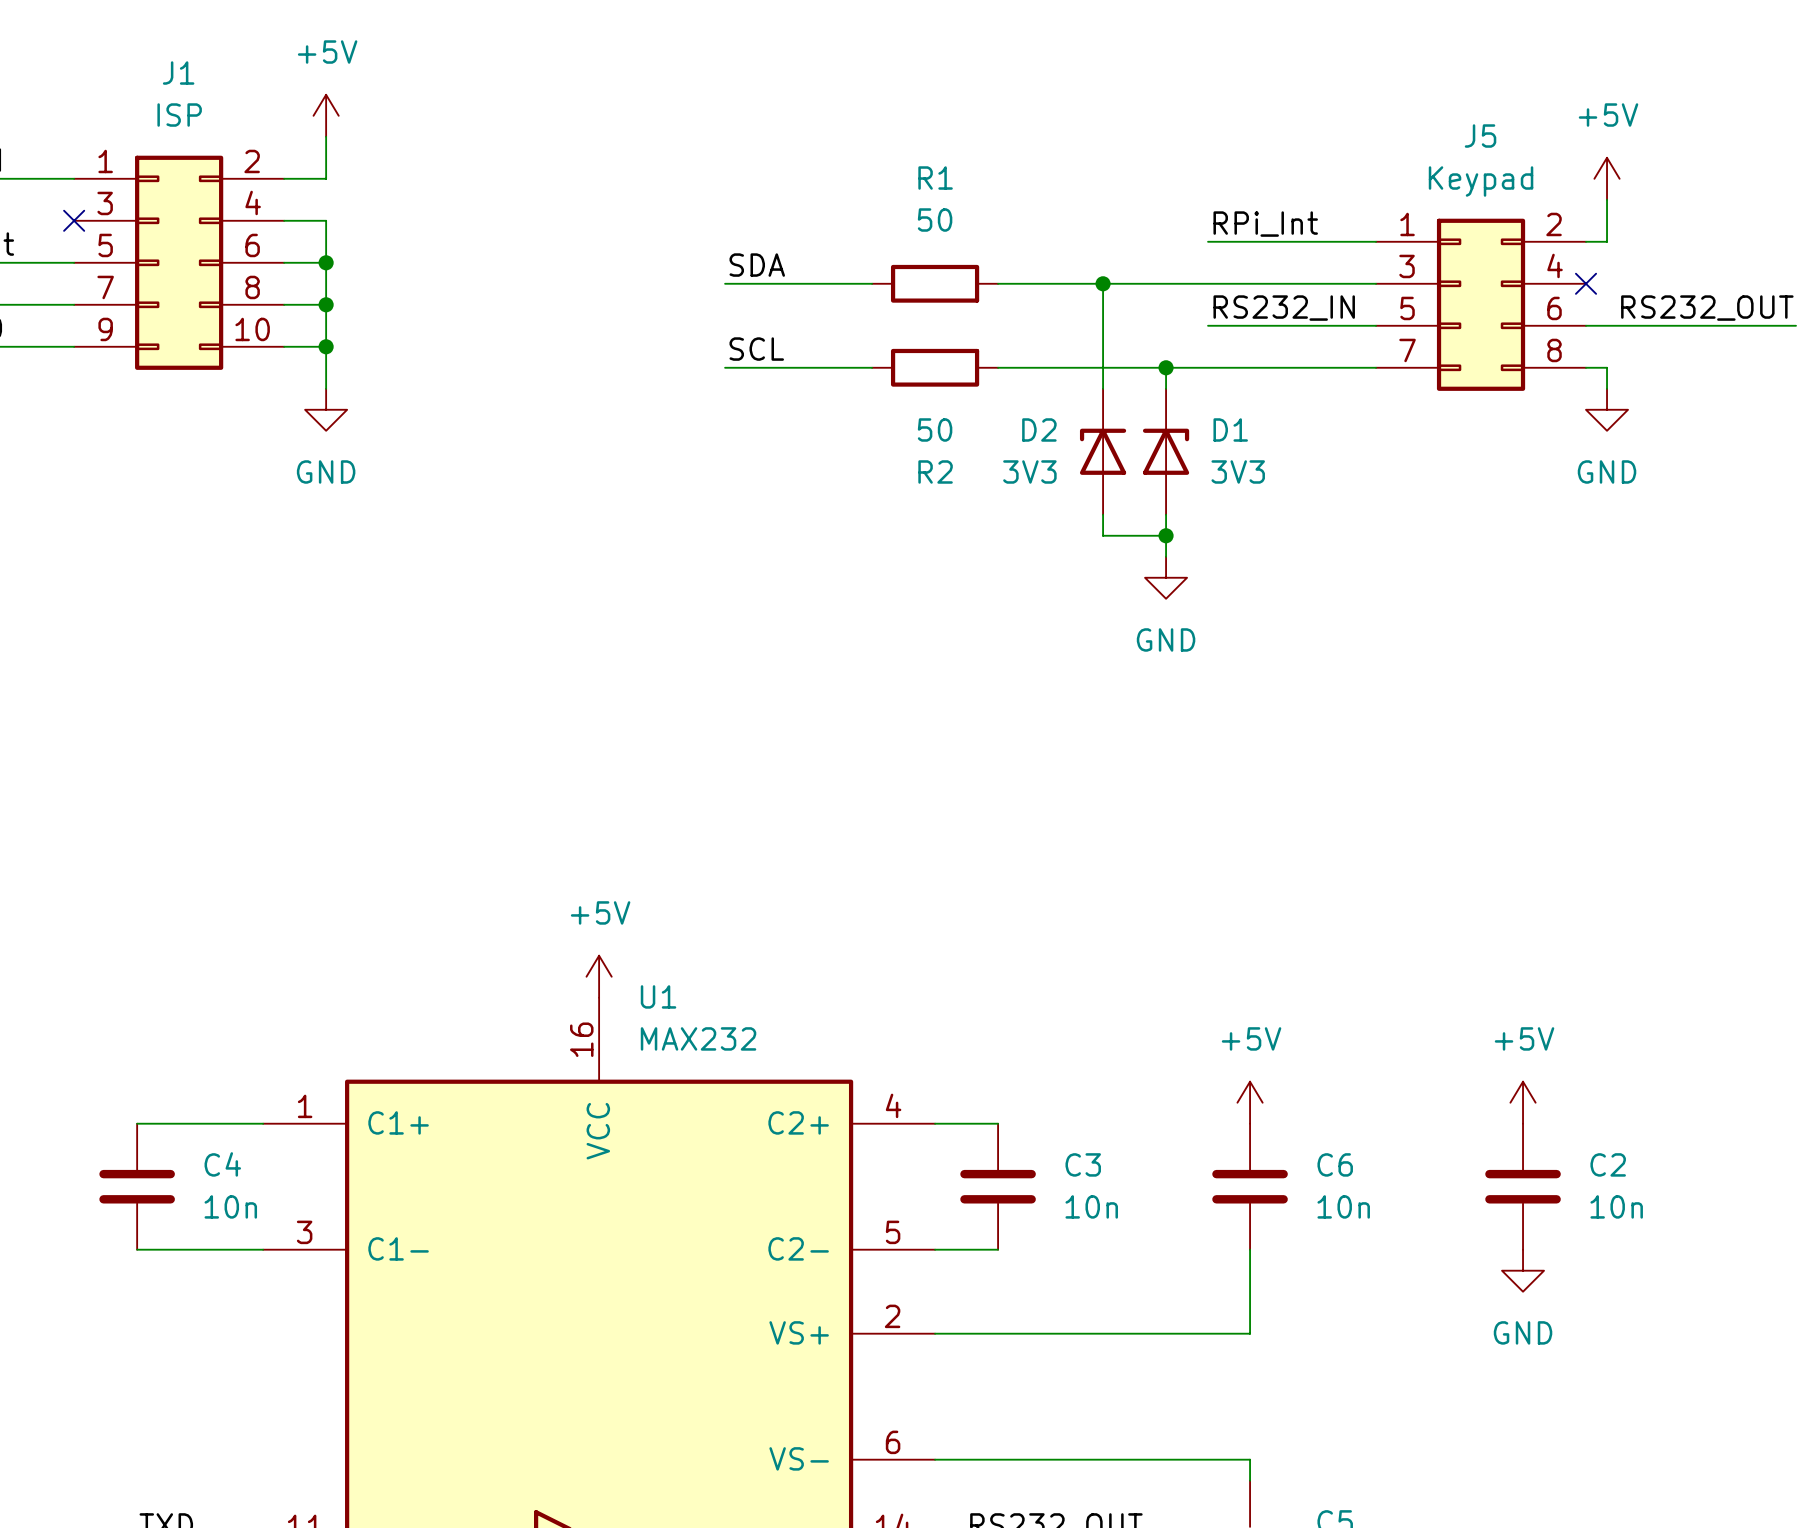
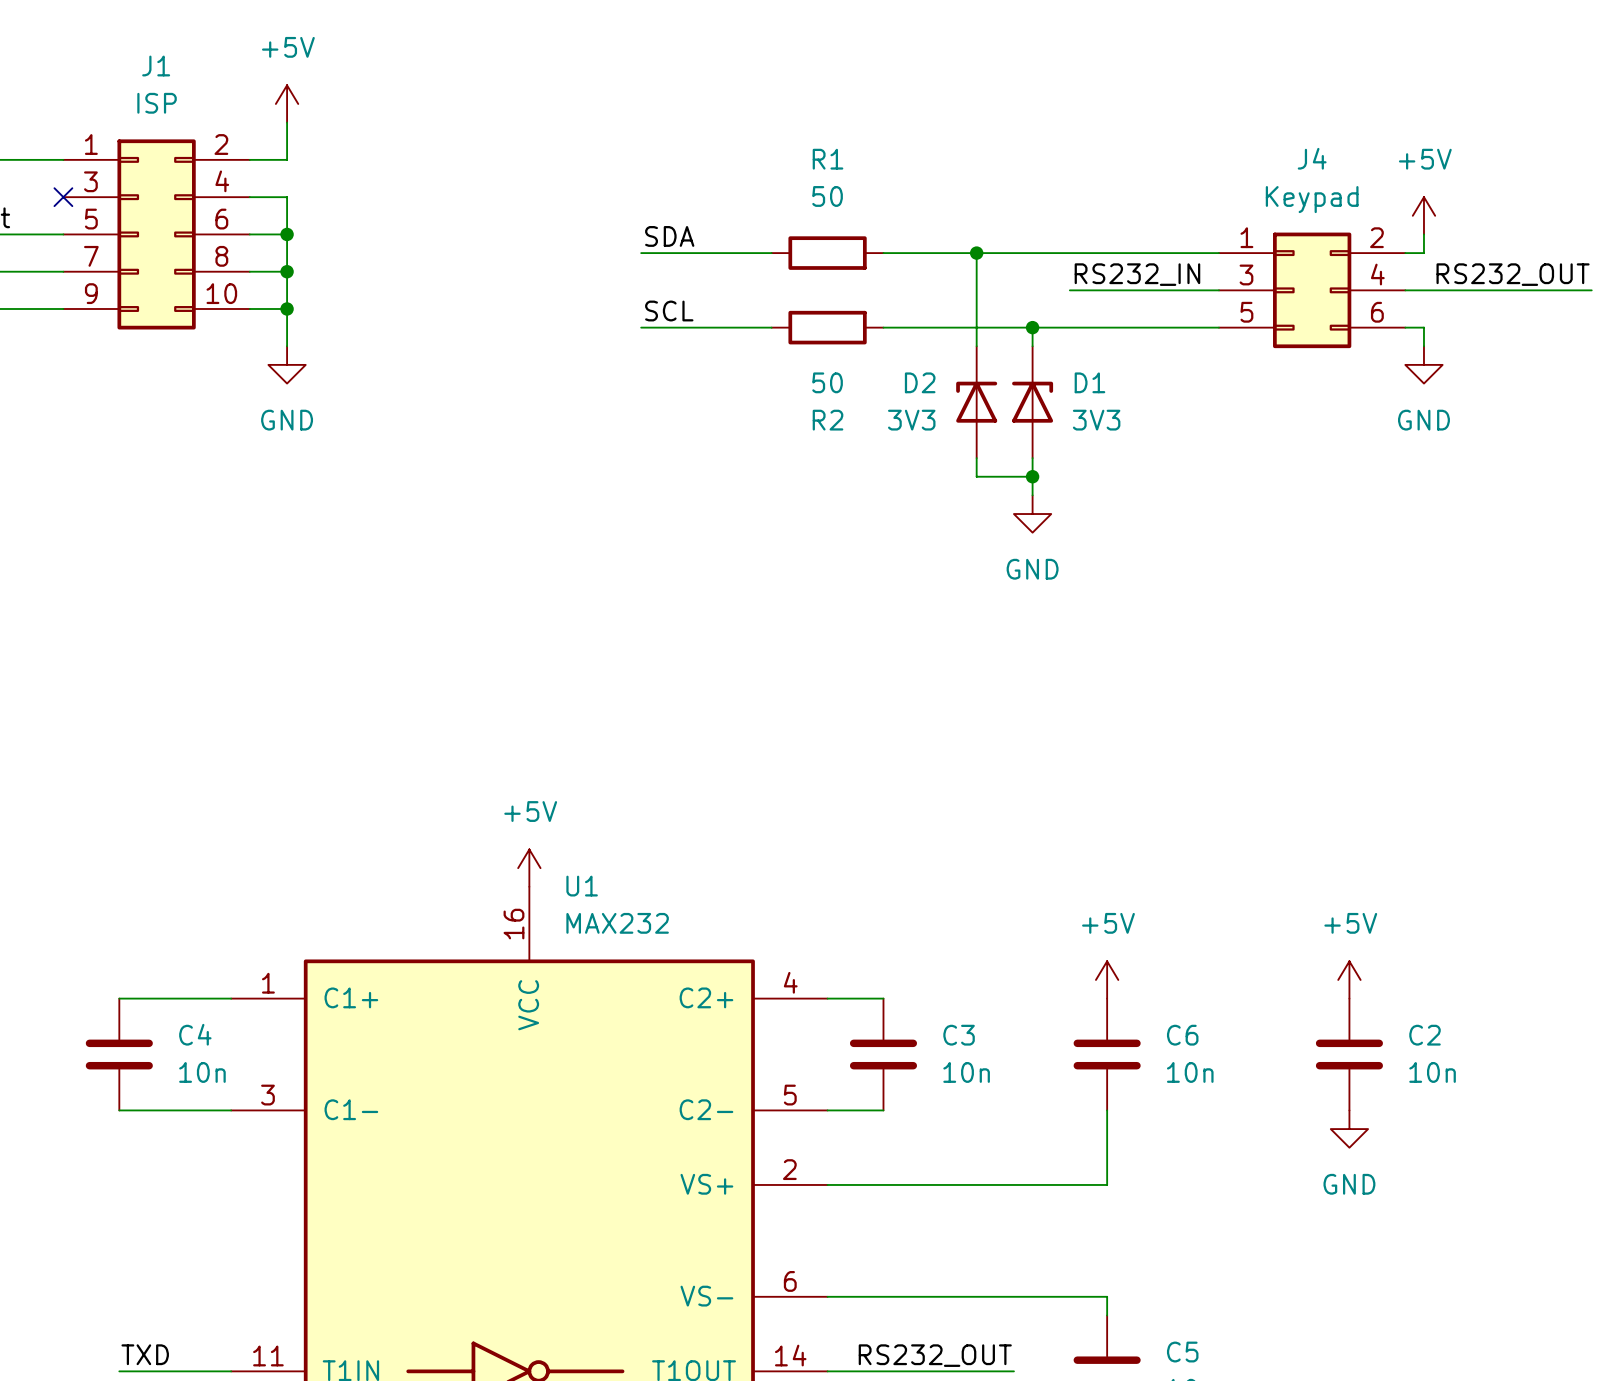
power symbol position: +5V (1607, 178) -> +5V (1423, 215)
wire: (1607, 199) (1607, 241) (1586, 241) -> none
label: RPi_Int (1265, 224) -> none
wire: (1208, 241) (1376, 241) -> none
wire: none -> (1423, 234) (1423, 253) (1405, 253)
no-connect mark: (1586, 283) -> none
J5: Keypad (1481, 304) -> none
J4: none -> Keypad (1312, 290)

